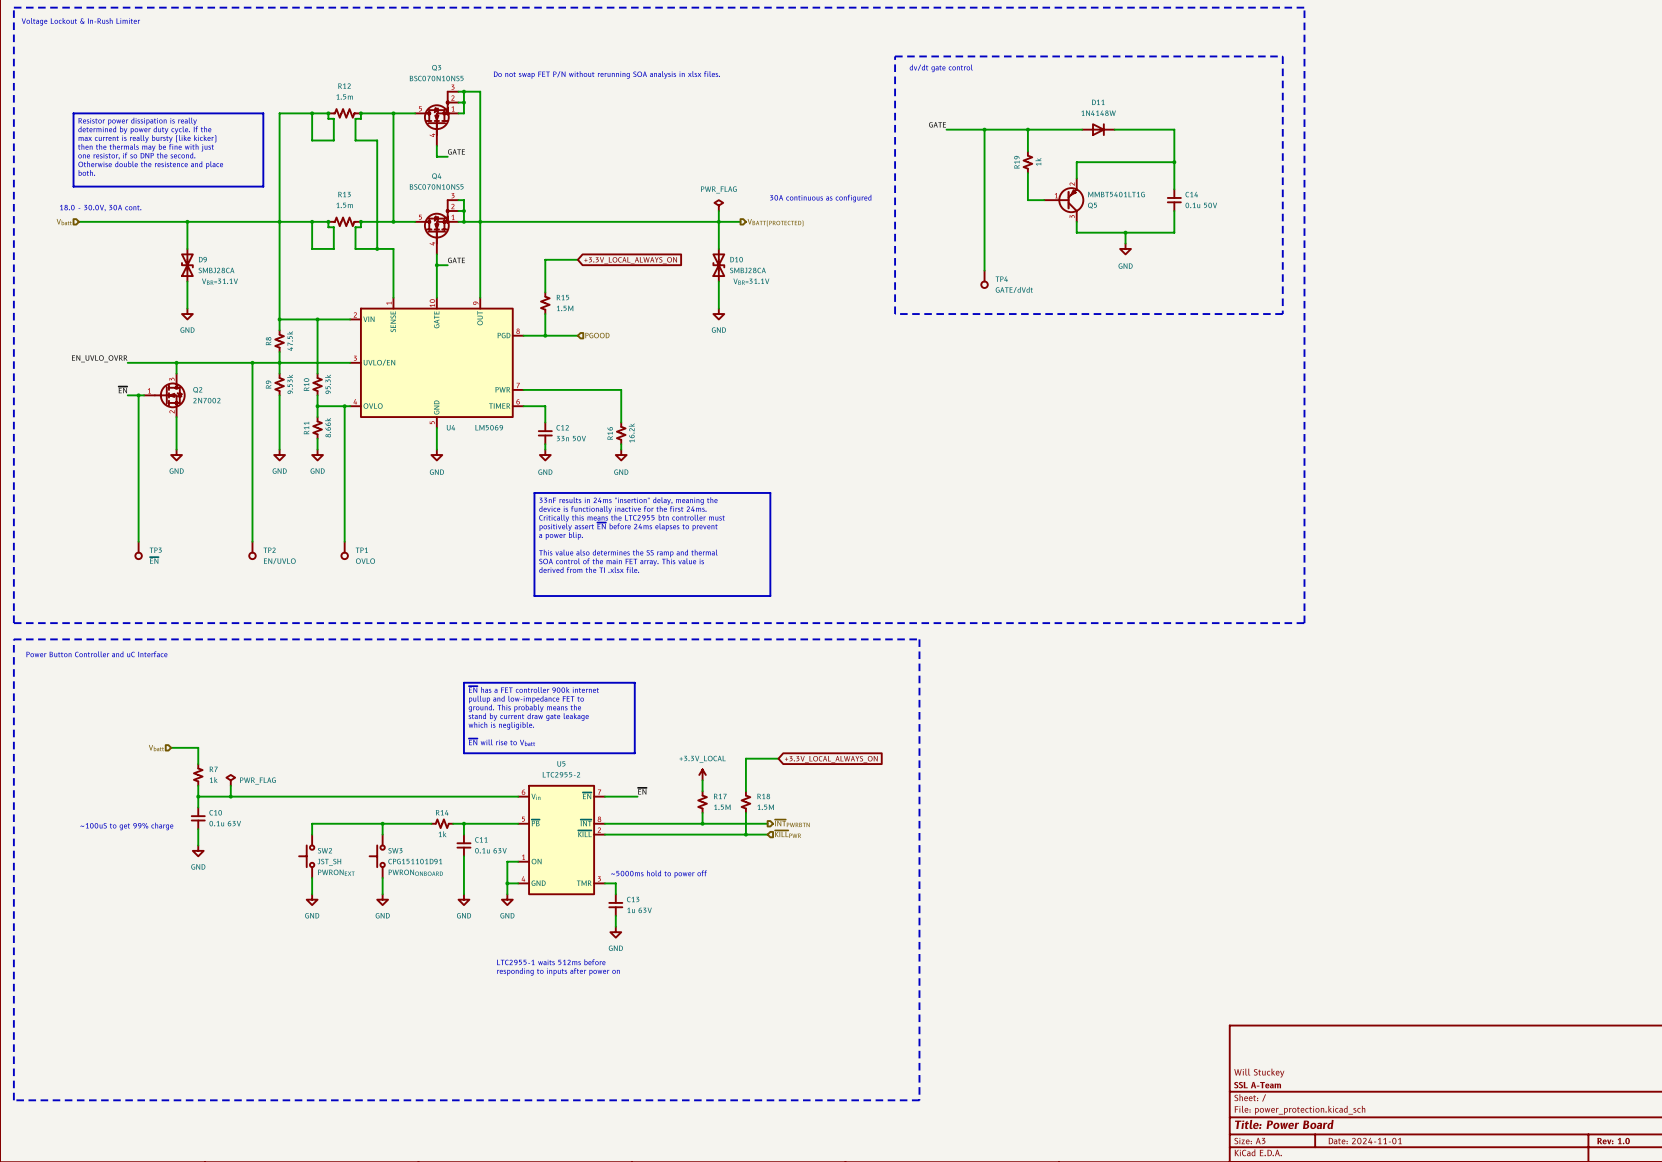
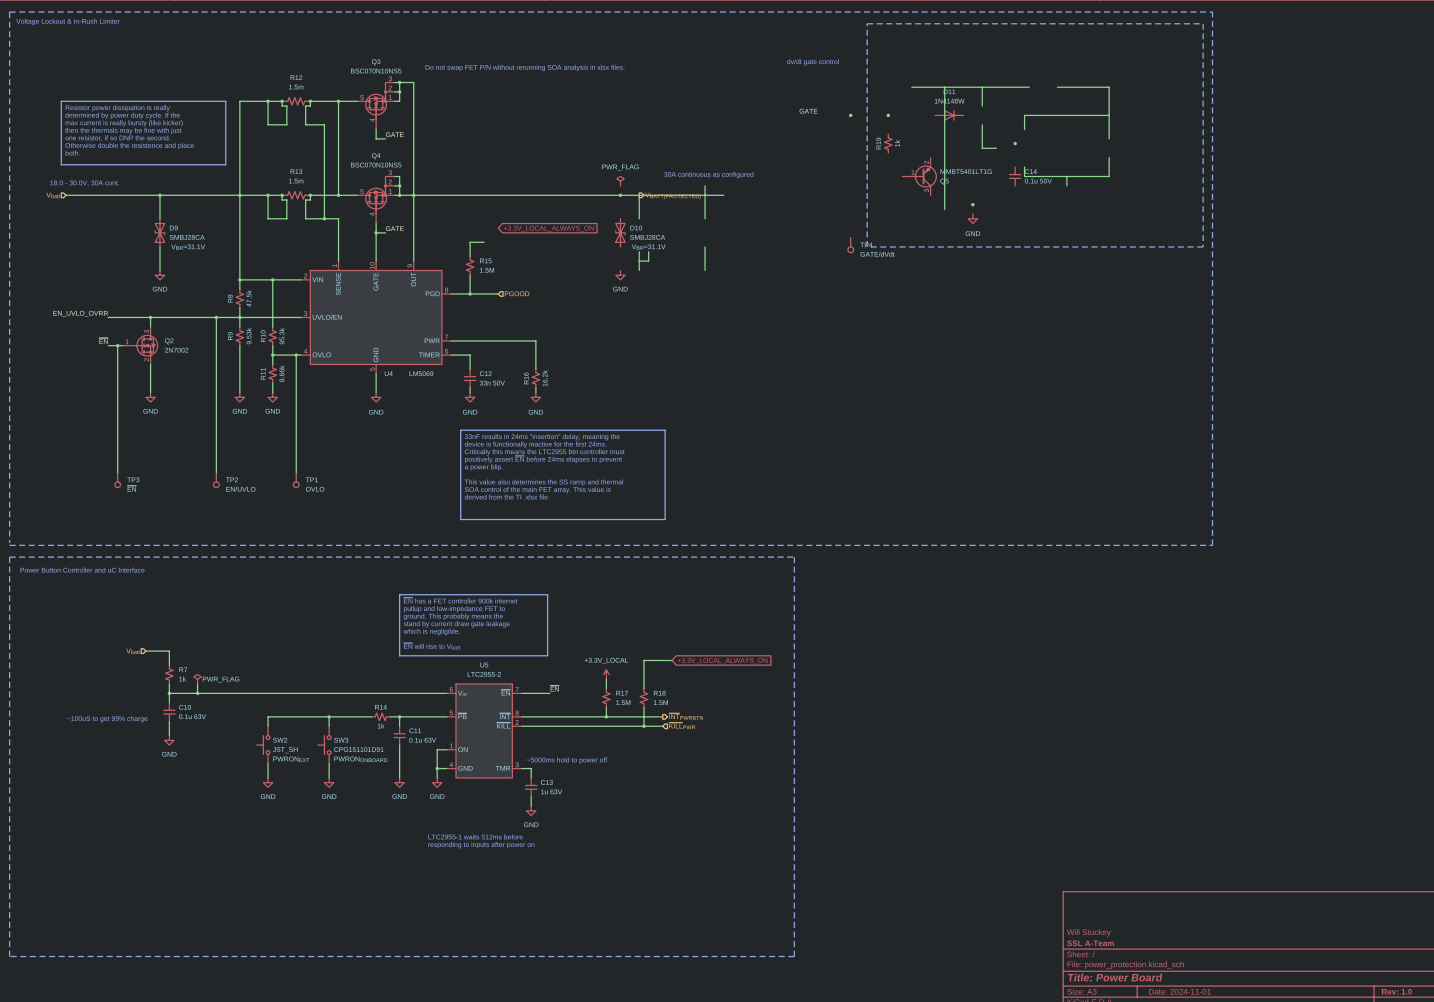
line: (13, 7) (1304, 7) (1304, 623) (13, 623) -> none
line: none -> (9, 12) (1212, 12) (1212, 545) (9, 545)
line: none -> (867, 23) (1203, 23) (1203, 246) (867, 246) (867, 23)
line: (895, 56) (1282, 56) (1282, 314) (895, 314) (895, 56) -> none
wire: none -> (911, 87) (1029, 87)
wire: none -> (944, 87) (944, 209)
wire: none -> (982, 87) (982, 106)
wire: none -> (1057, 87) (1109, 87) (1109, 138)
wire: (946, 129) (1082, 129) -> none
wire: (984, 129) (984, 270) -> none
wire: (1027, 129) (1027, 151) -> none
wire: (1114, 129) (1174, 129) (1174, 189) -> none
wire: none -> (1109, 115) (1024, 115) (1024, 129)
wire: none -> (982, 124) (982, 148) (996, 148)
wire: (1174, 162) (1076, 162) (1076, 178) -> none
wire: (1027, 173) (1027, 200) (1044, 200) -> none
wire: none -> (1109, 157) (1109, 176) (1024, 176) (1024, 167)
wire: none -> (1066, 176) (1066, 185)
wire: (718, 210) (718, 248) -> (705, 185) (705, 218)
wire: (1174, 210) (1174, 232) (1076, 232) (1076, 221) -> none
wire: none -> (723, 195) (639, 195) (639, 218)
wire: (1125, 232) (1125, 243) -> none
wire: (577, 259) (545, 259) (545, 276) -> (484, 242) (470, 242)
wire: (718, 281) (718, 308) -> (705, 246) (705, 270)
wire: none -> (639, 251) (639, 270)
wire: none -> (648, 251) (648, 261) (639, 261)

